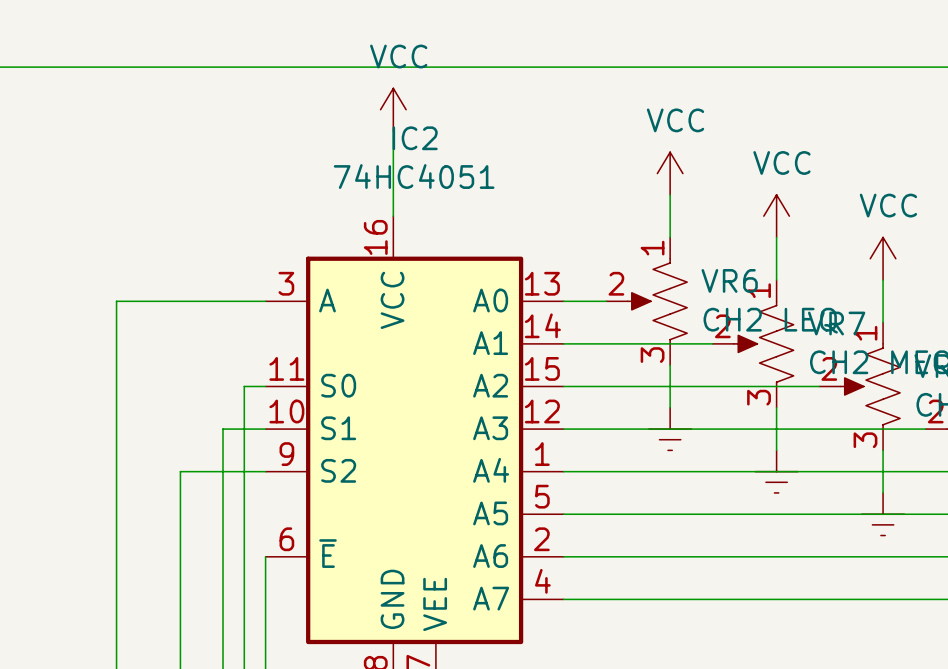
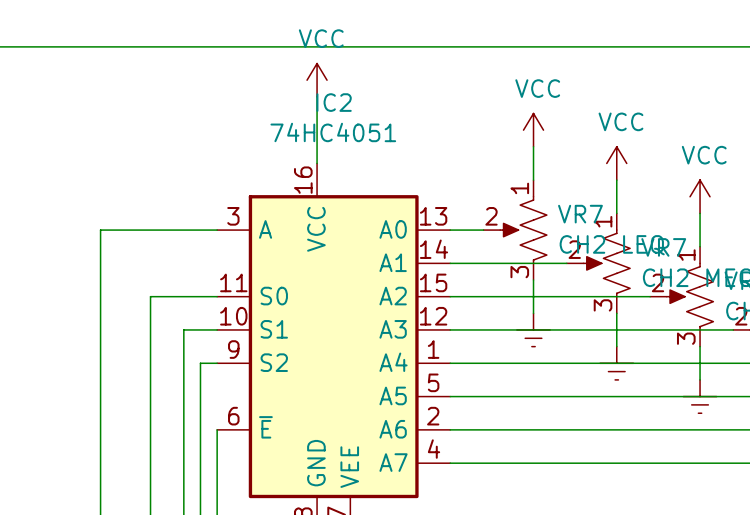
VR6 name: VR6 (729, 280) -> VR7 (580, 214)
wire: (244, 386) (244, 471) (180, 471) -> (200, 296) (150, 296) (150, 363)

